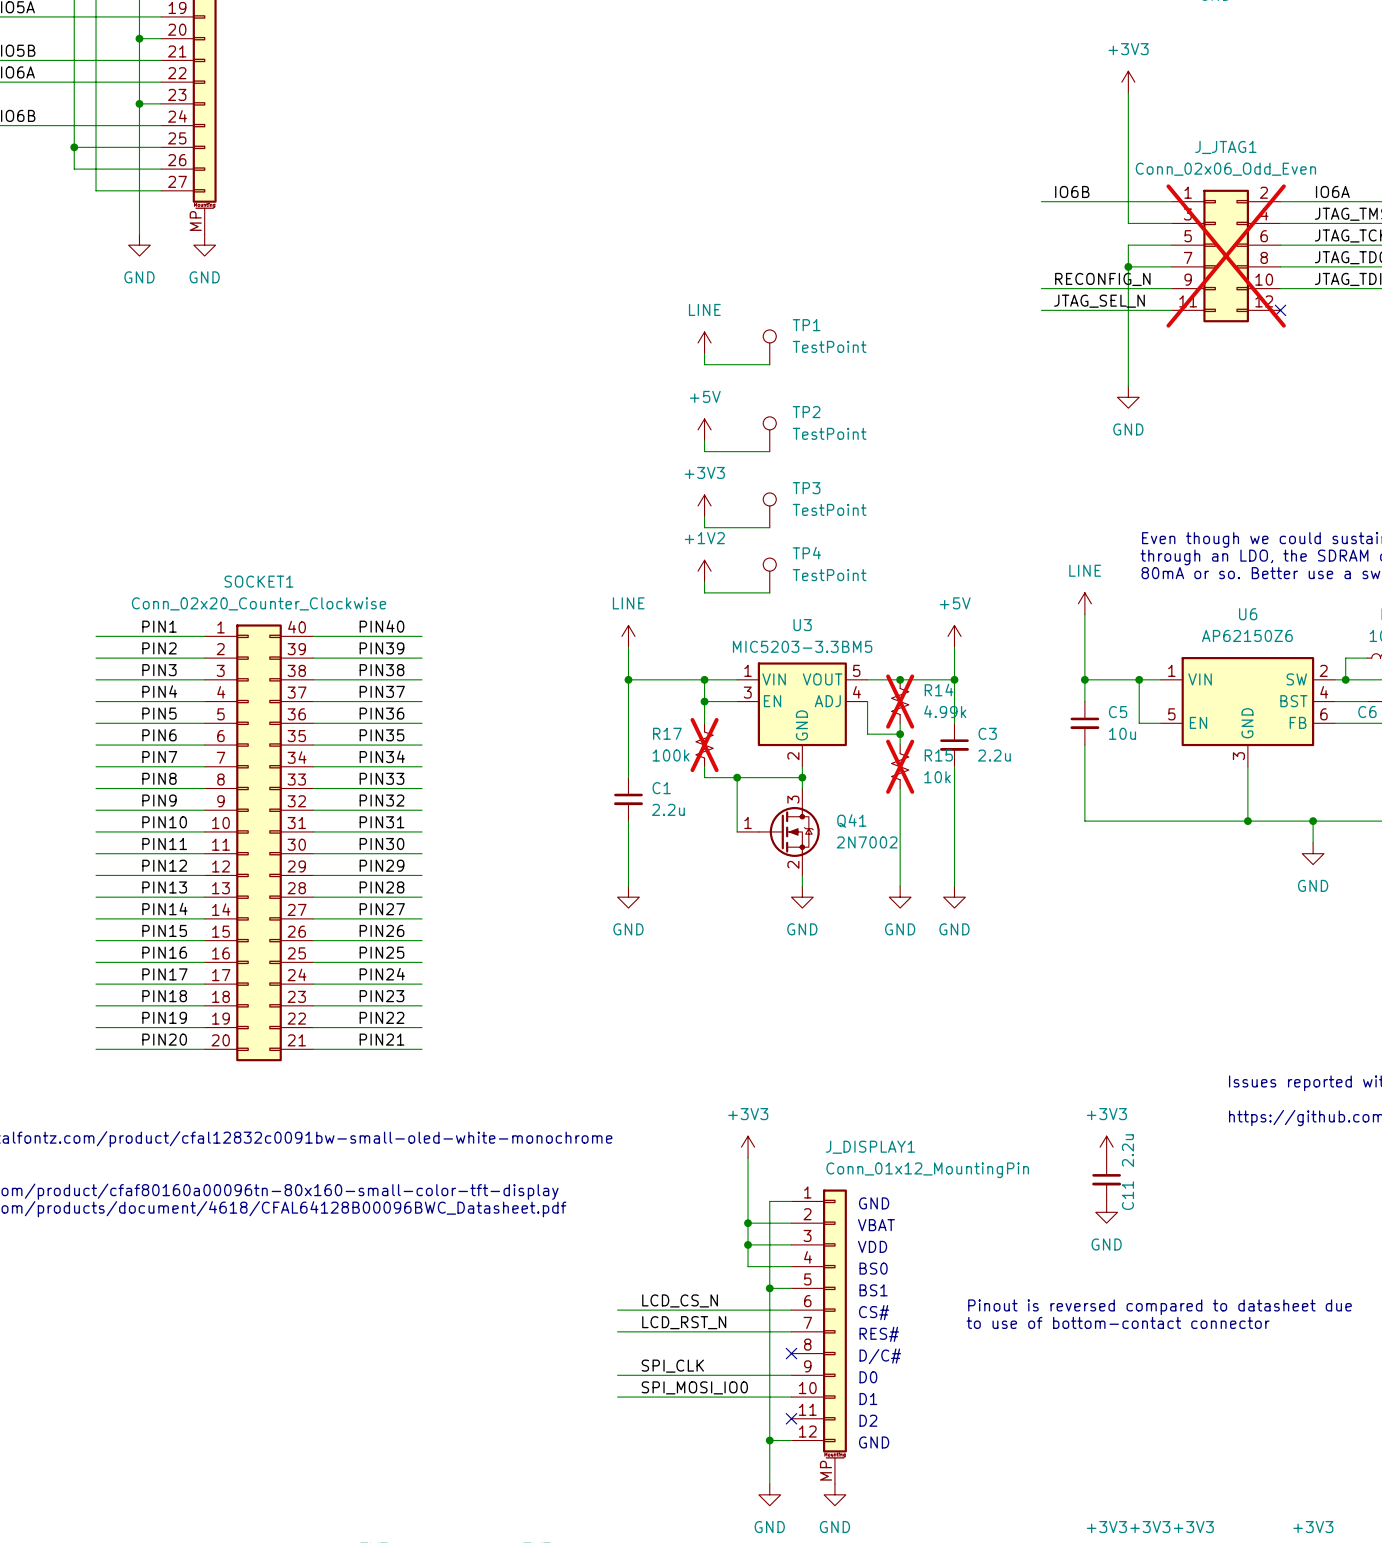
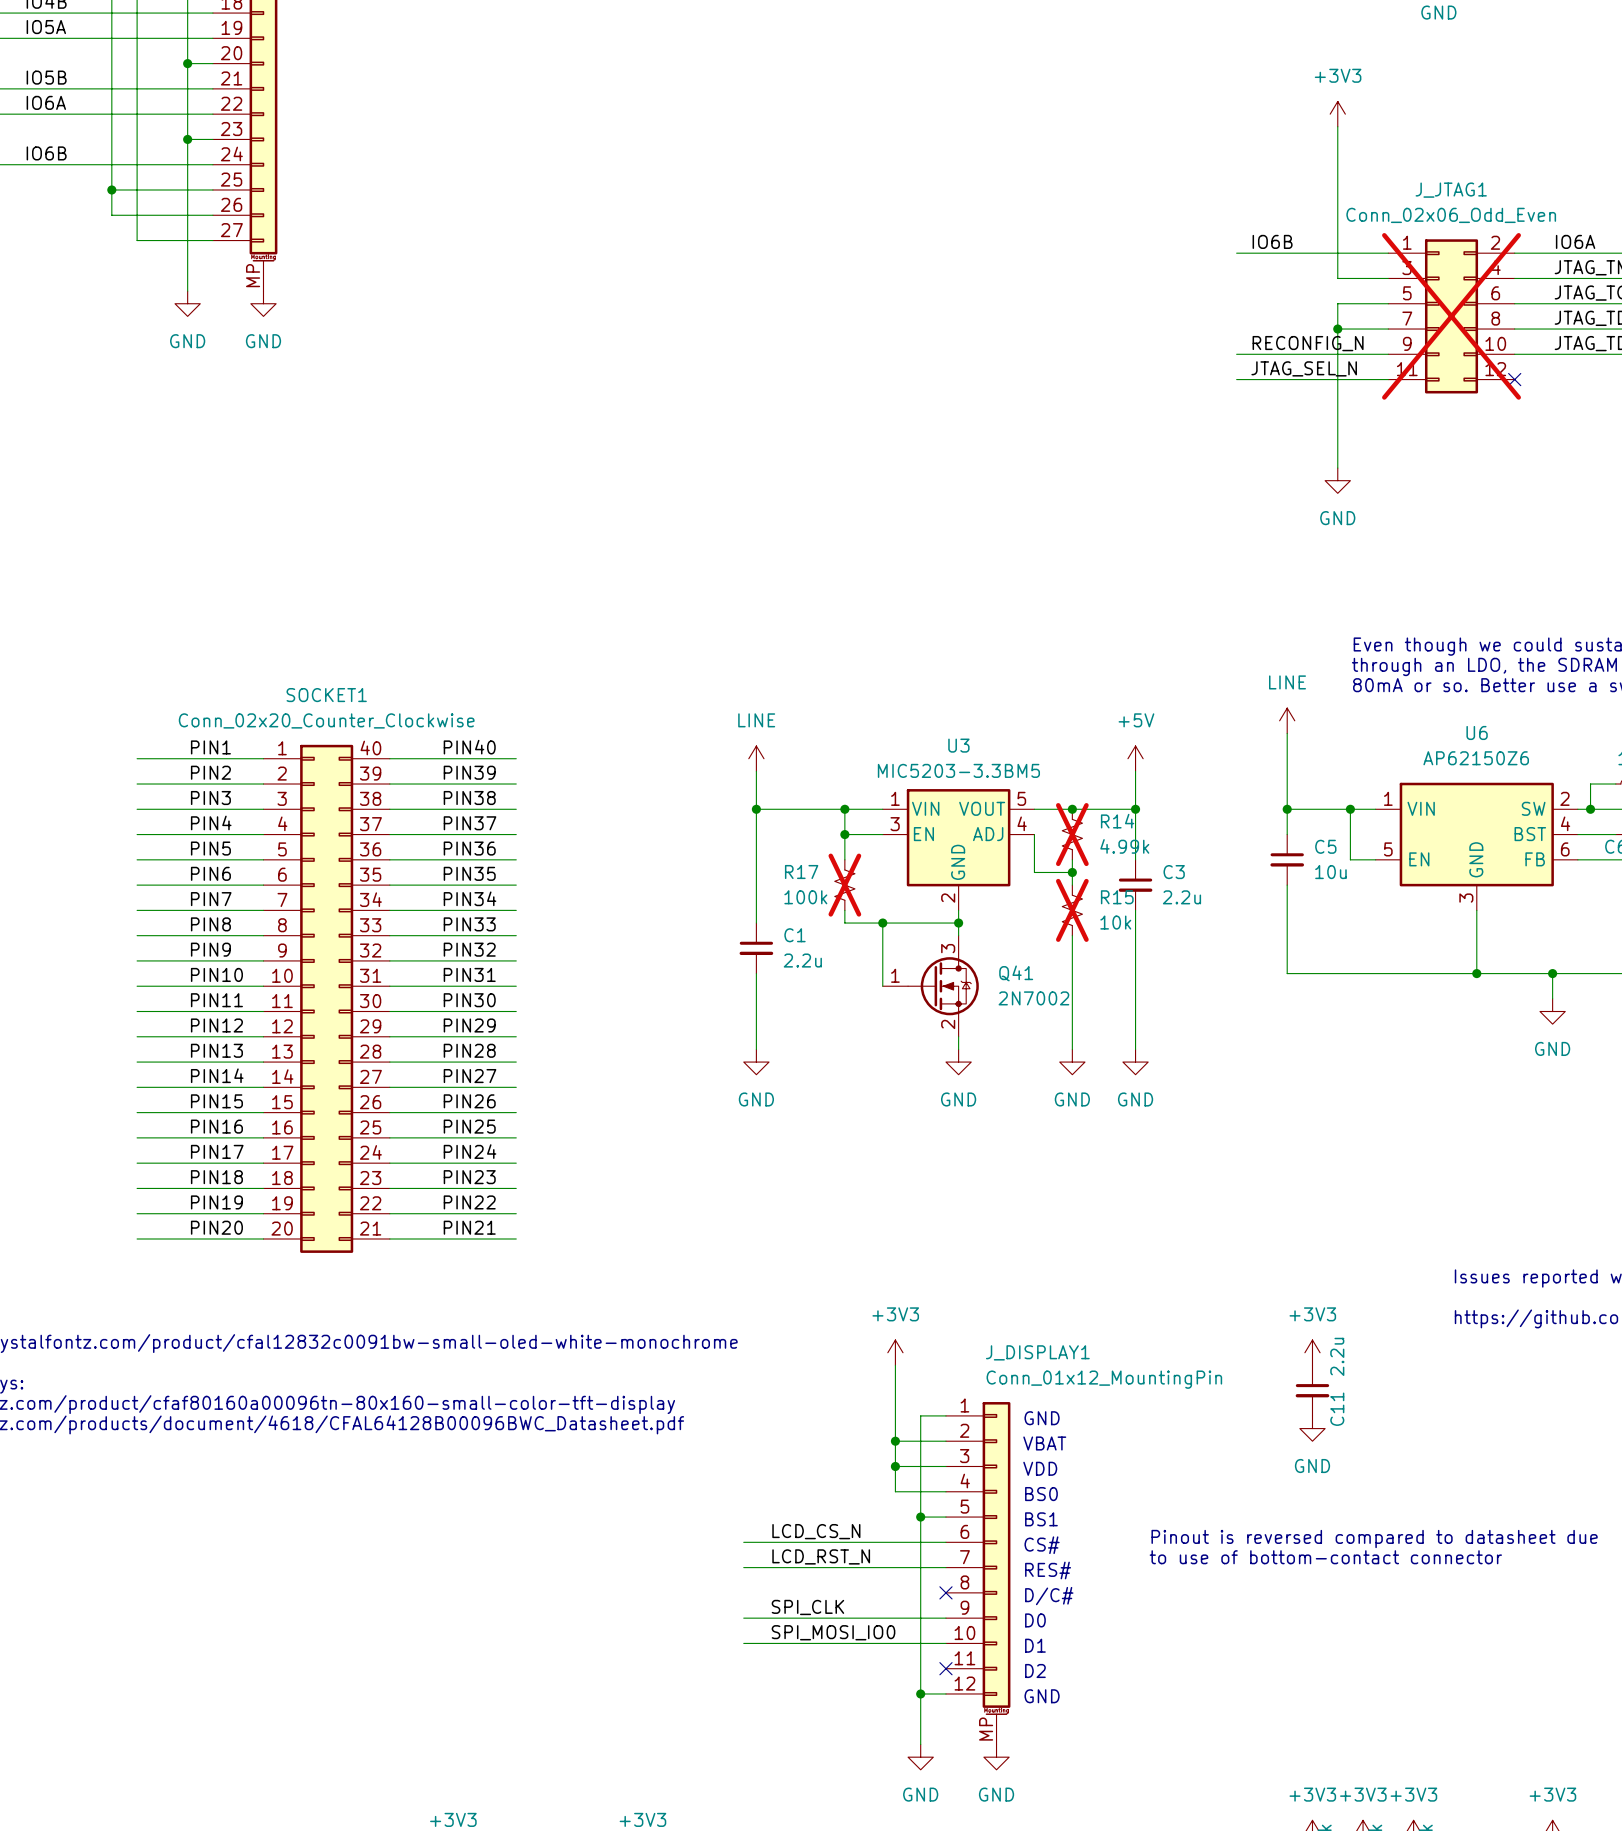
power symbol: LINE (704, 342) -> none
TP1: TestPoint (769, 347) -> none
wire: (704, 353) (704, 364) (769, 364) -> none
power symbol: +5V (704, 429) -> none
TP2: TestPoint (769, 434) -> none
wire: (704, 440) (704, 451) (769, 451) -> none
power symbol: +3V3 (704, 505) -> none
TP3: TestPoint (769, 510) -> none
wire: (704, 516) (704, 527) (769, 527) -> none
power symbol: +1V2 (704, 571) -> none
TP4: TestPoint (769, 575) -> none
wire: (704, 582) (704, 592) (769, 592) -> none

